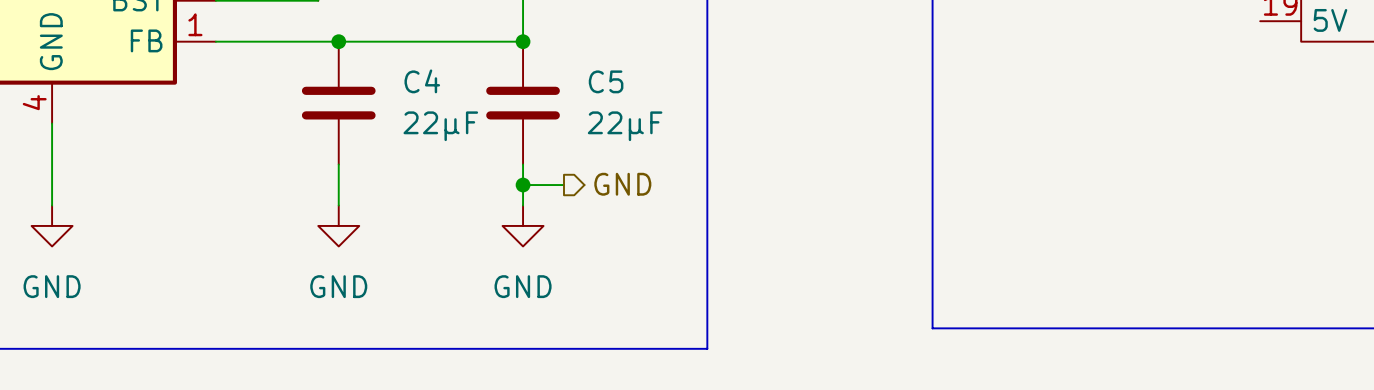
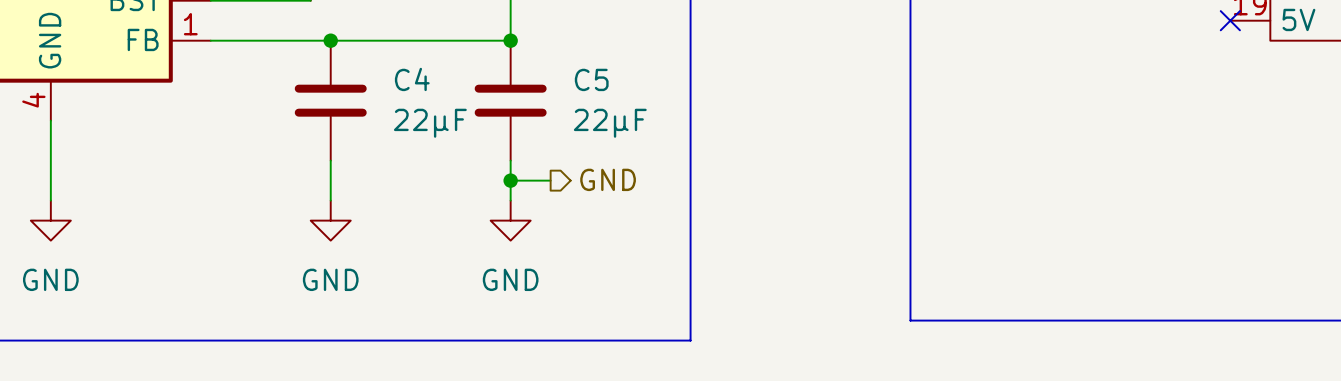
no-connect mark: none -> (1230, 20)

